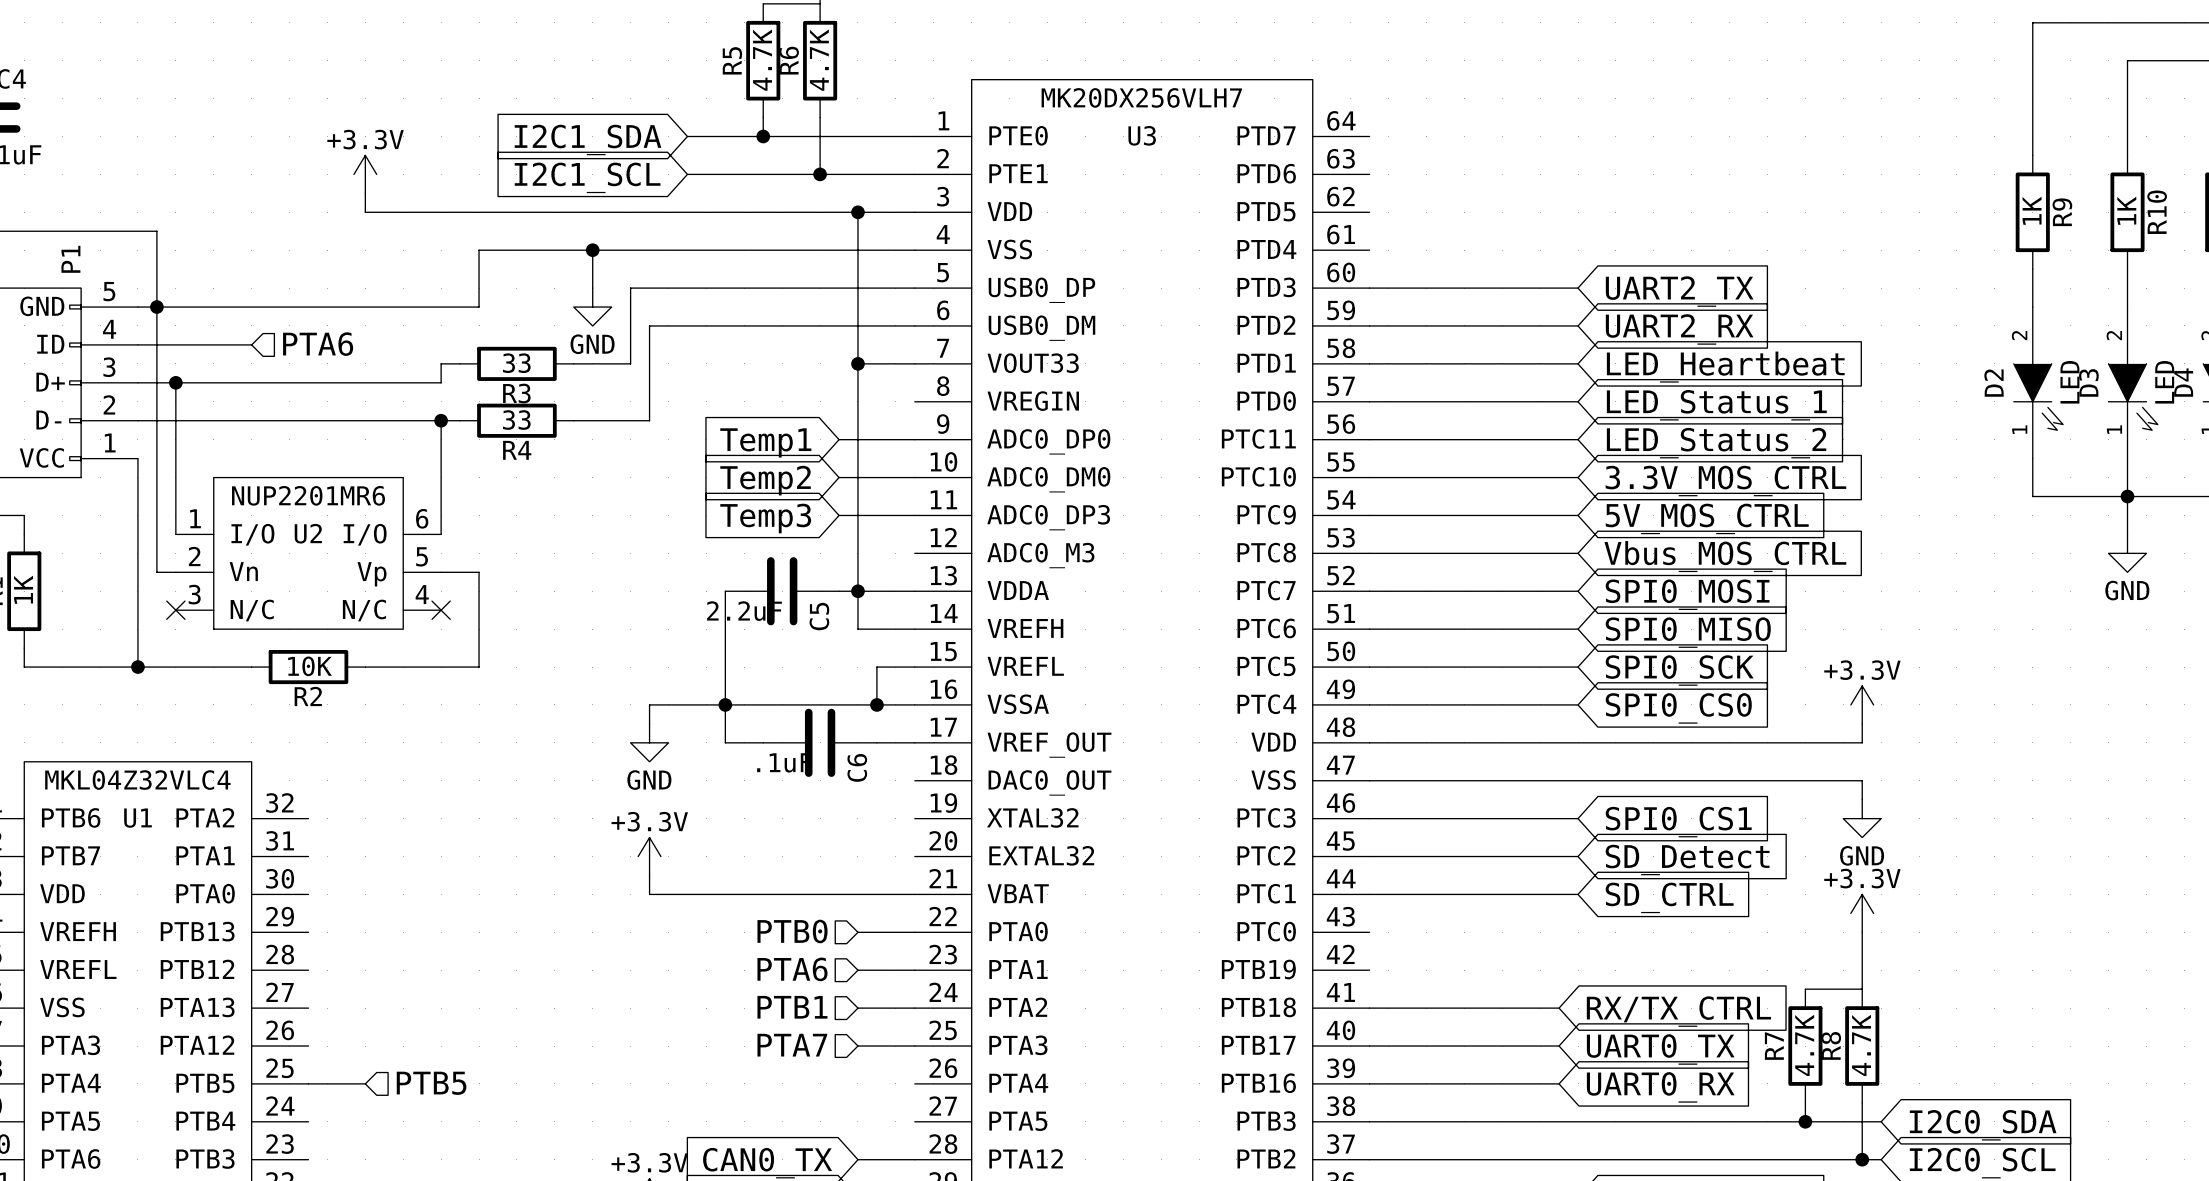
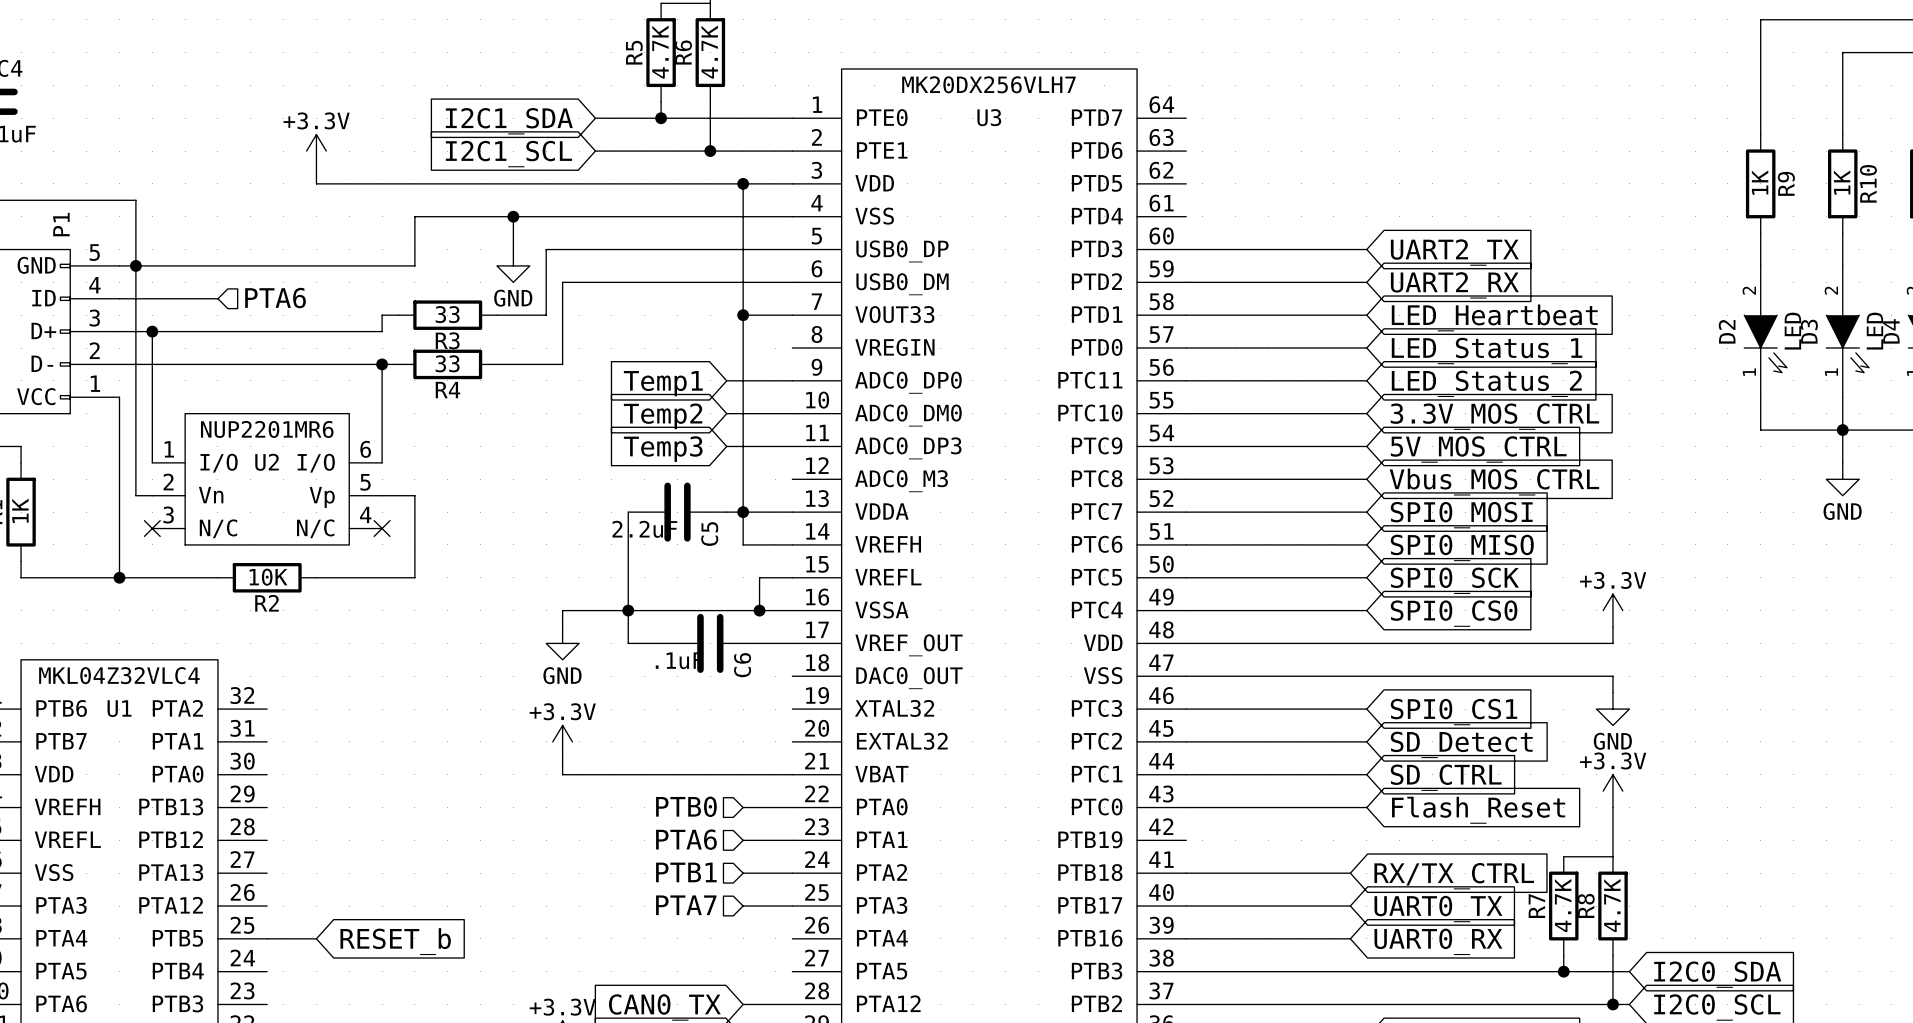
wire: none -> (1186, 807) (1366, 807)
global label: none -> Flash_Reset (1478, 810)
hierarchical label: PTB5 (431, 1083) -> none
global label: none -> RESET_b (395, 941)

